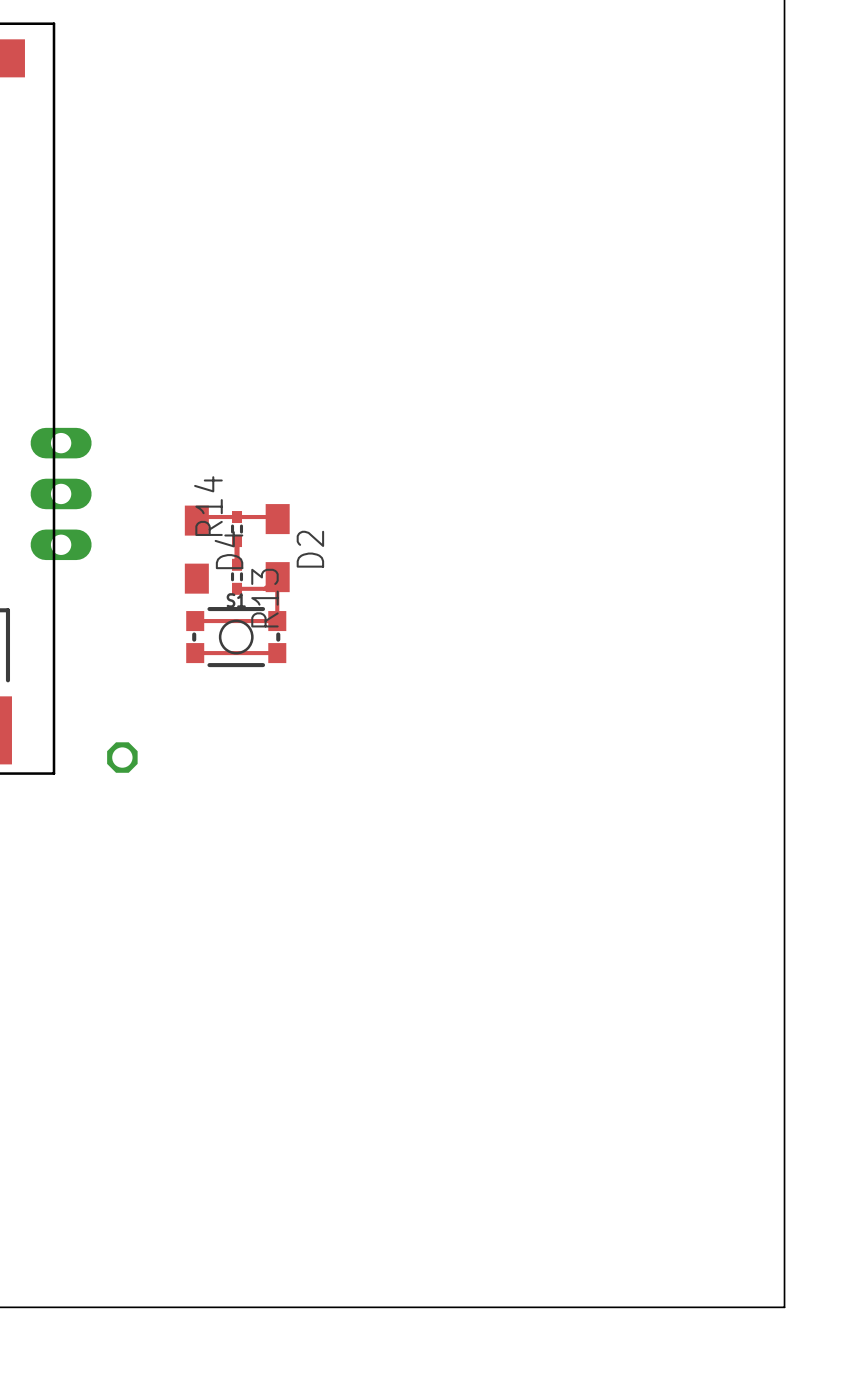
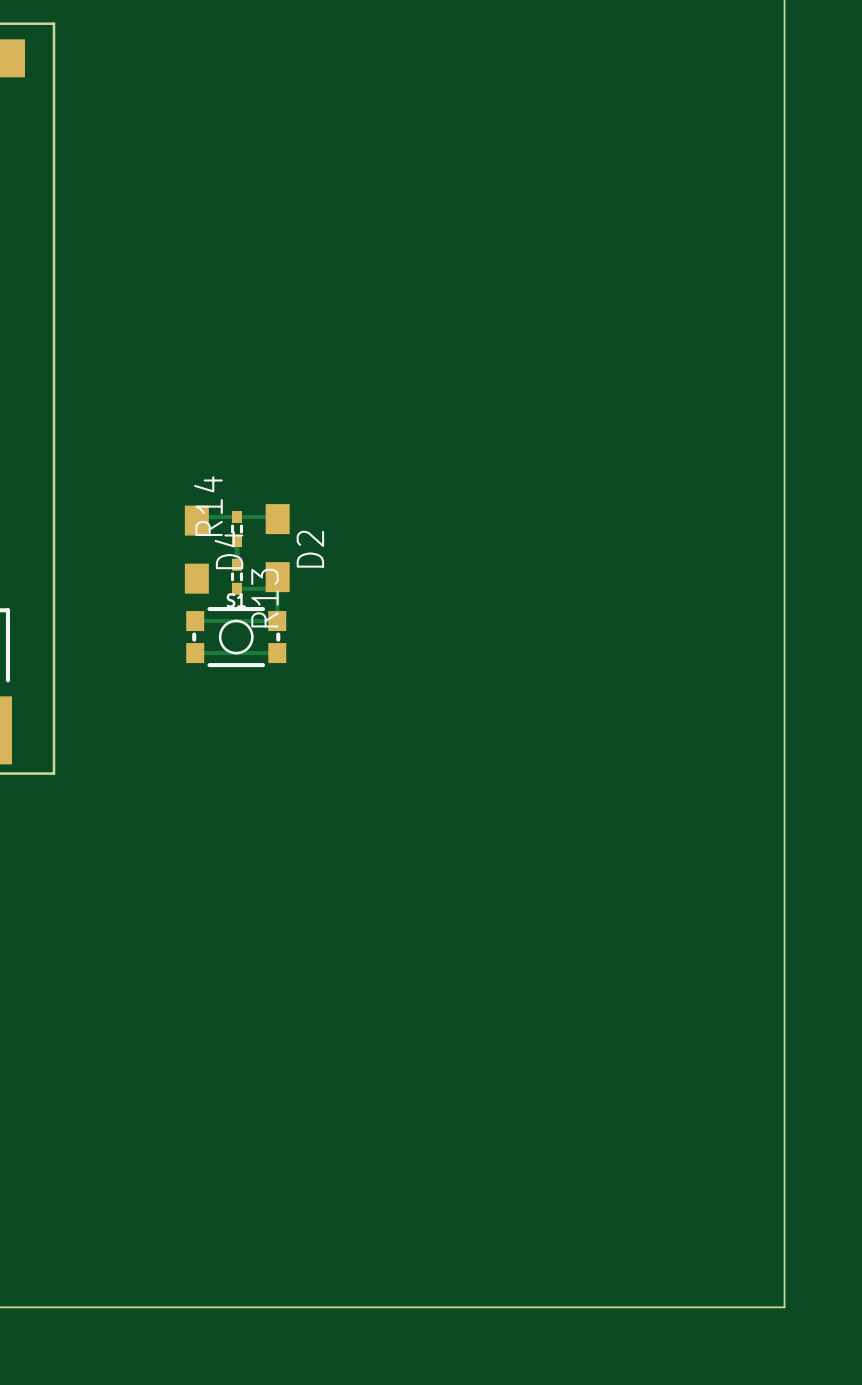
part: (61, 493) -> none
part: (122, 757) -> none

